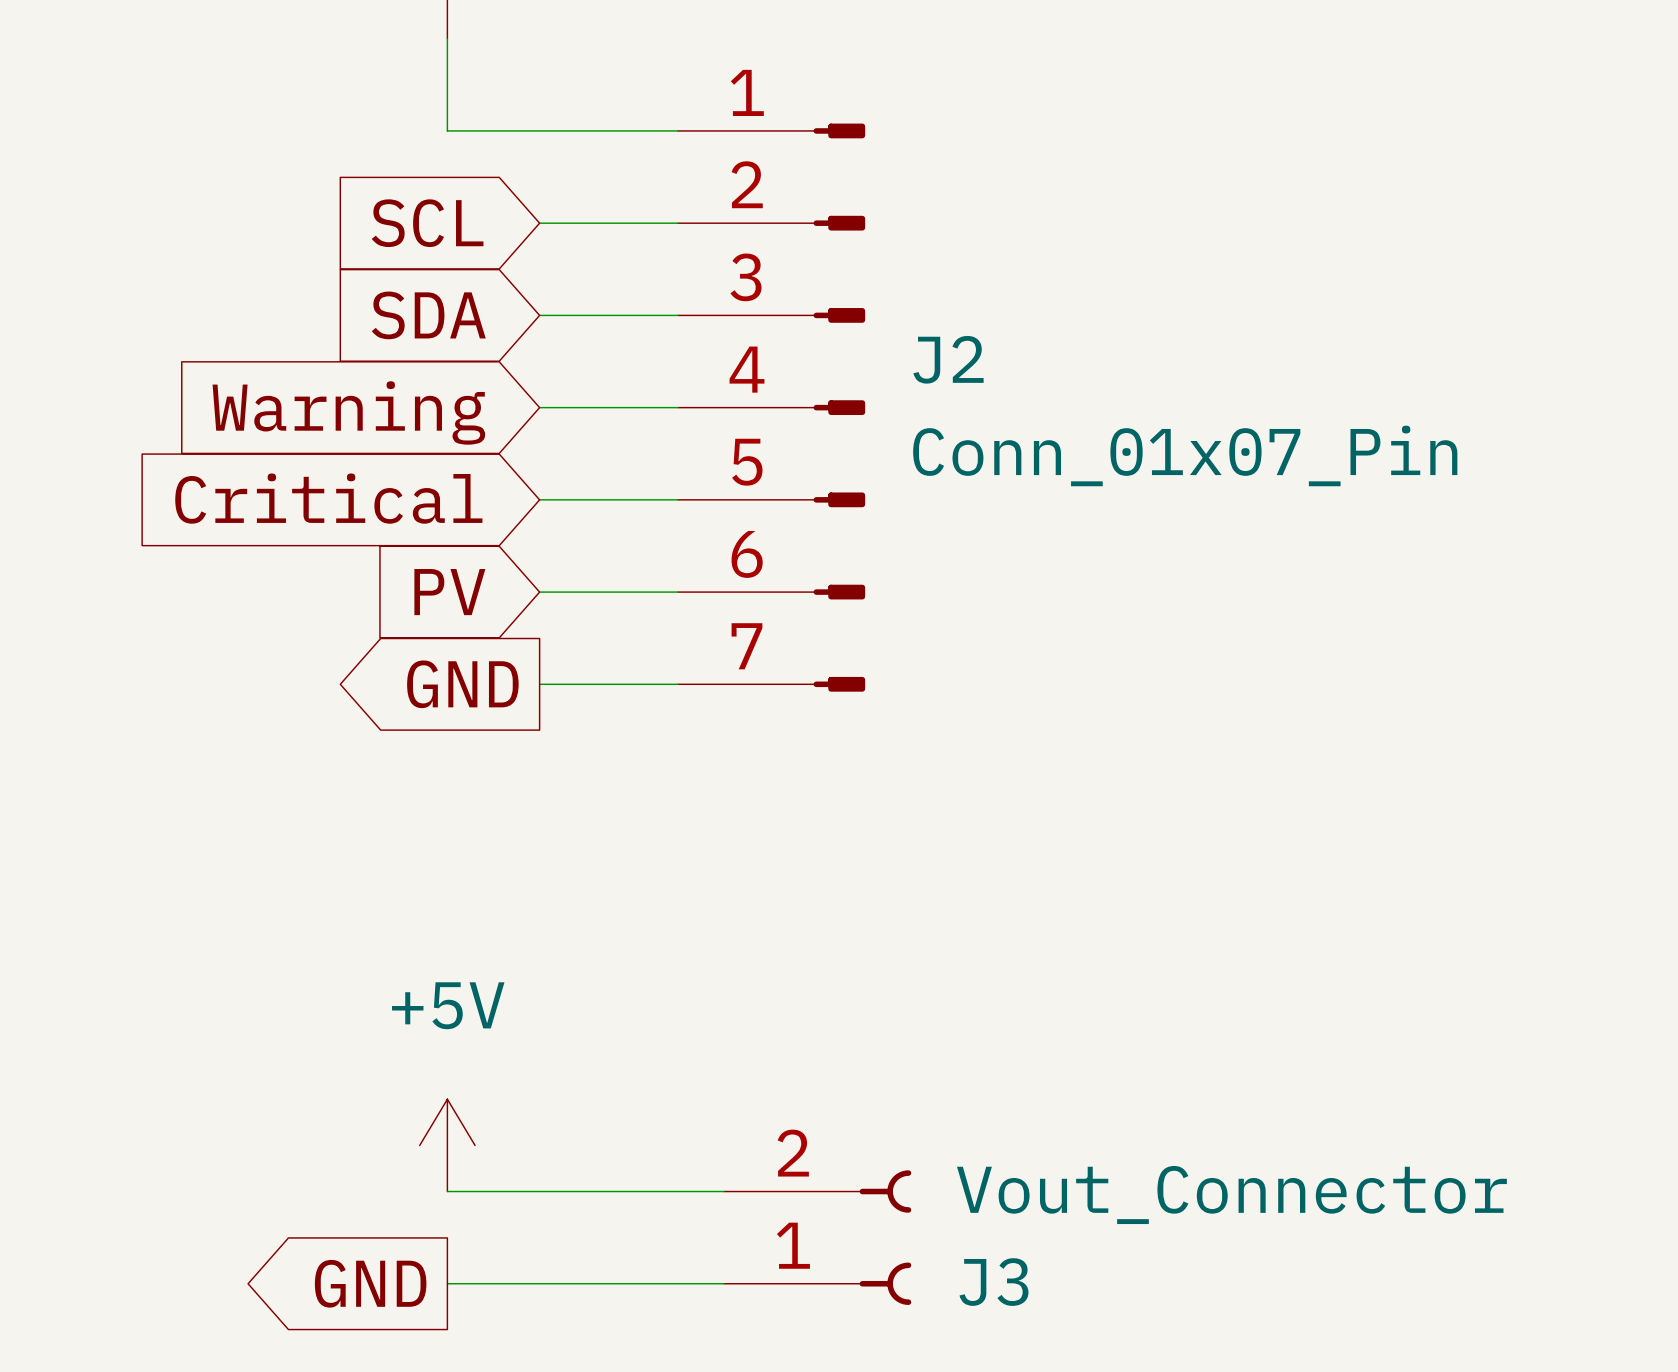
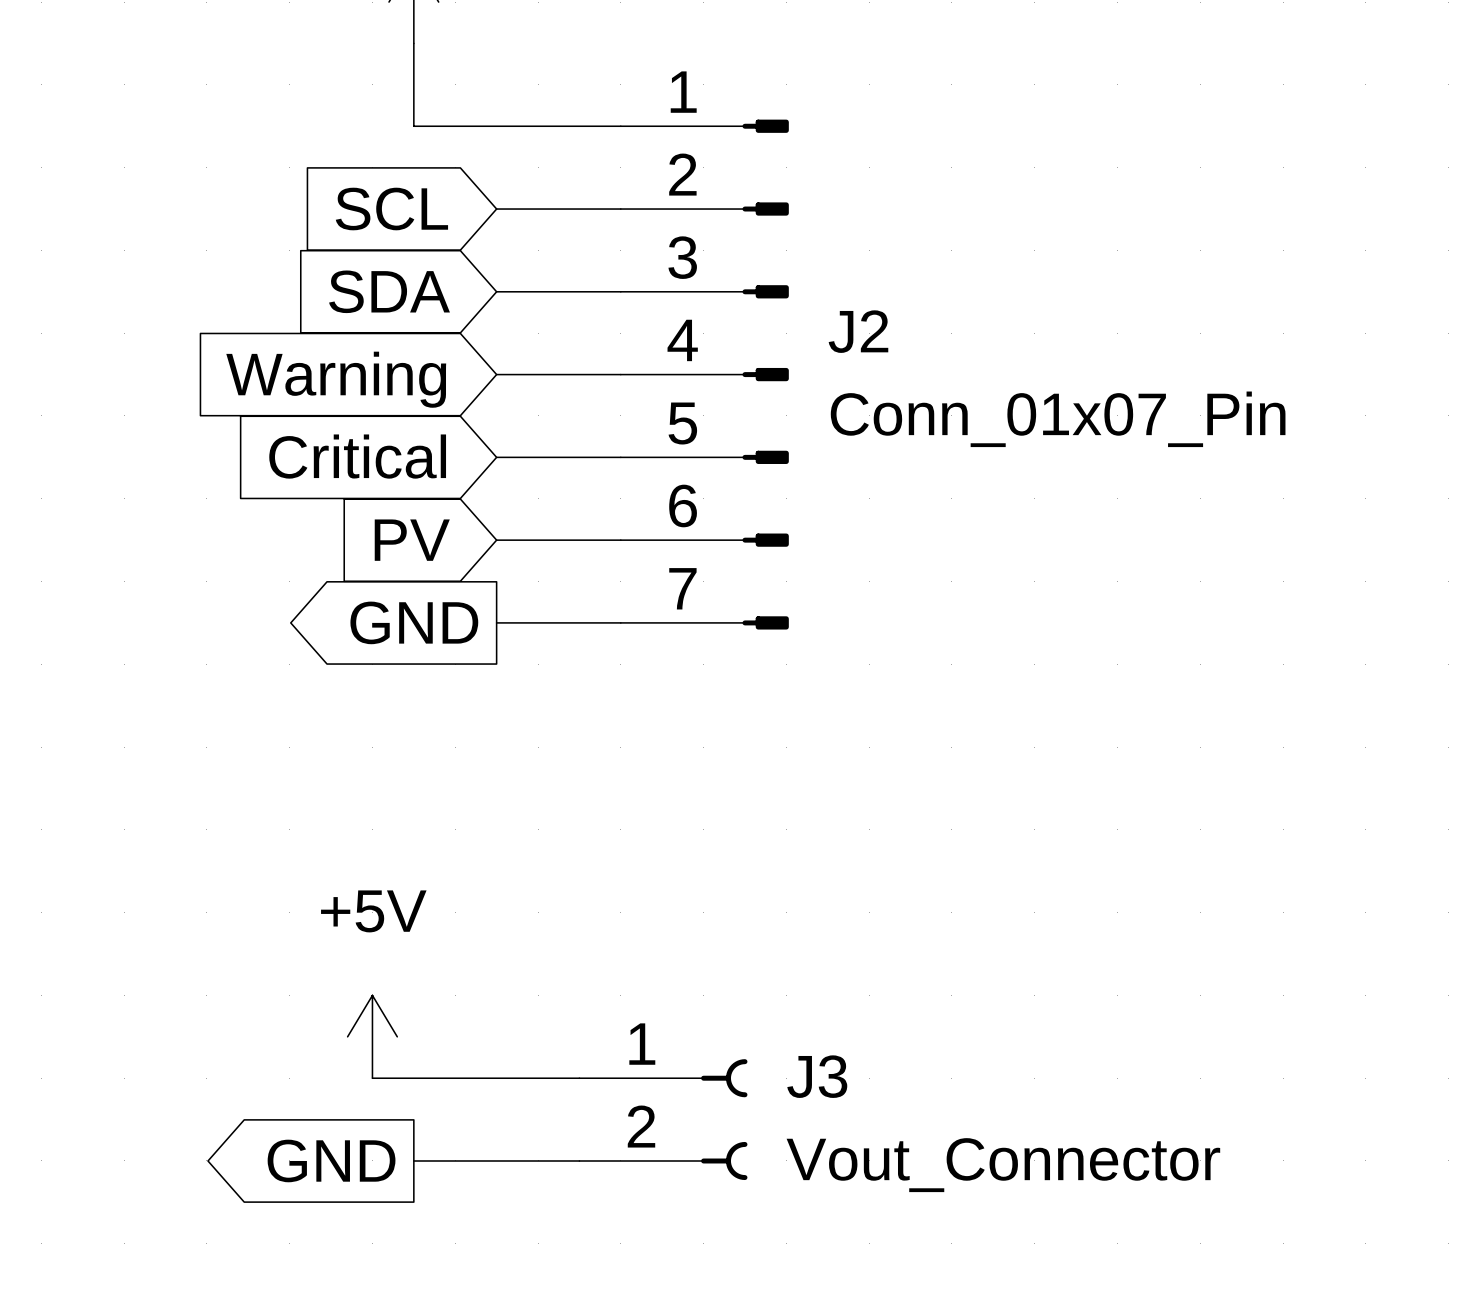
power symbol position: +5V (447, 1145) -> +5V (372, 1036)
wire: none -> (372, 1078) (413, 1078)
J3 flip: as is (885, 1237) -> up-down (724, 1119)

